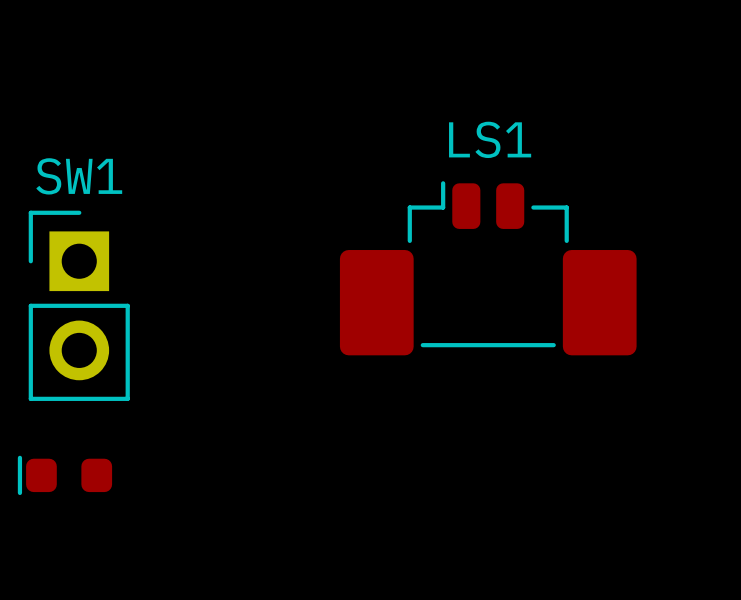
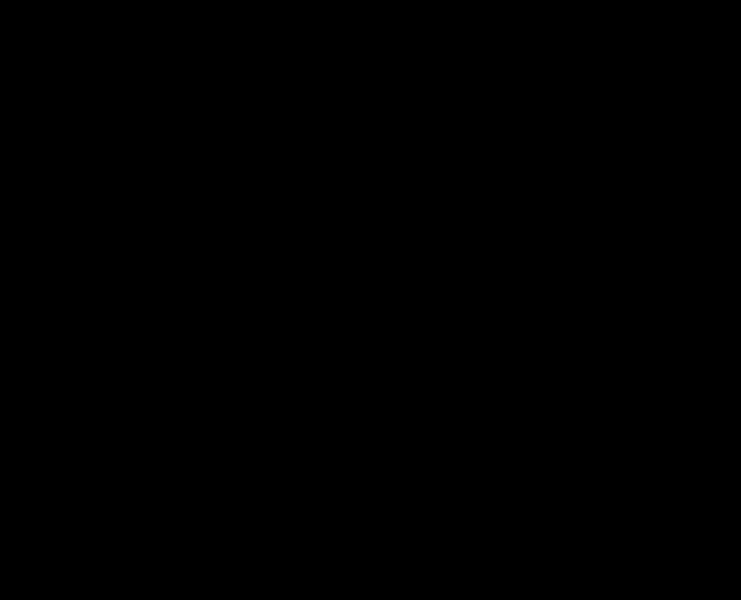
LS1: (488, 268) -> none
SW1: (79, 305) -> none
part: (64, 475) -> none

